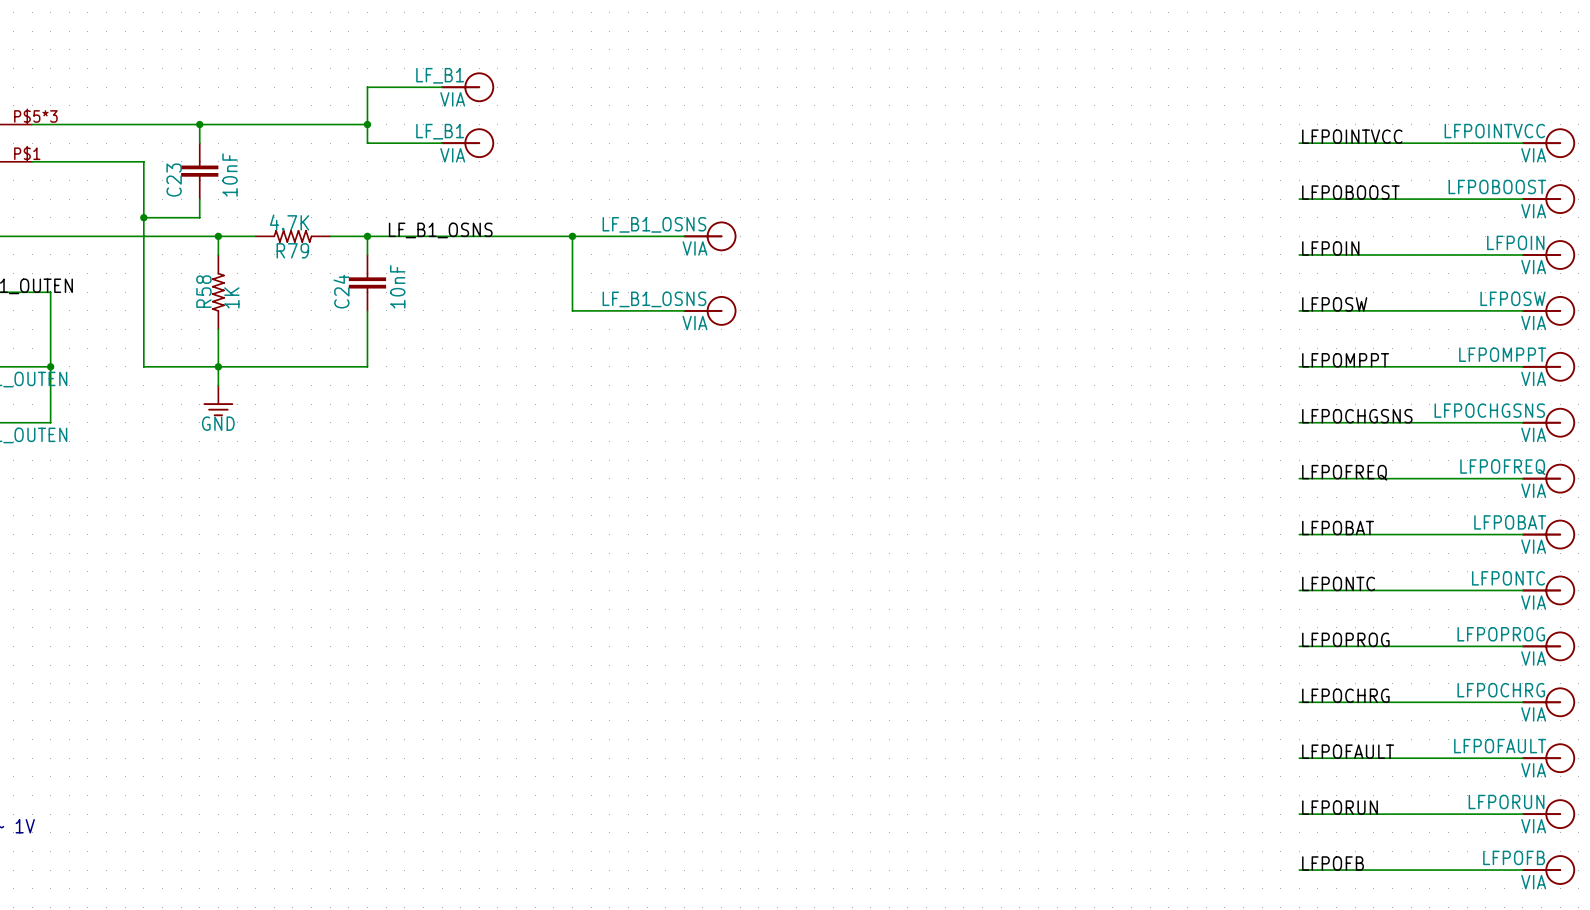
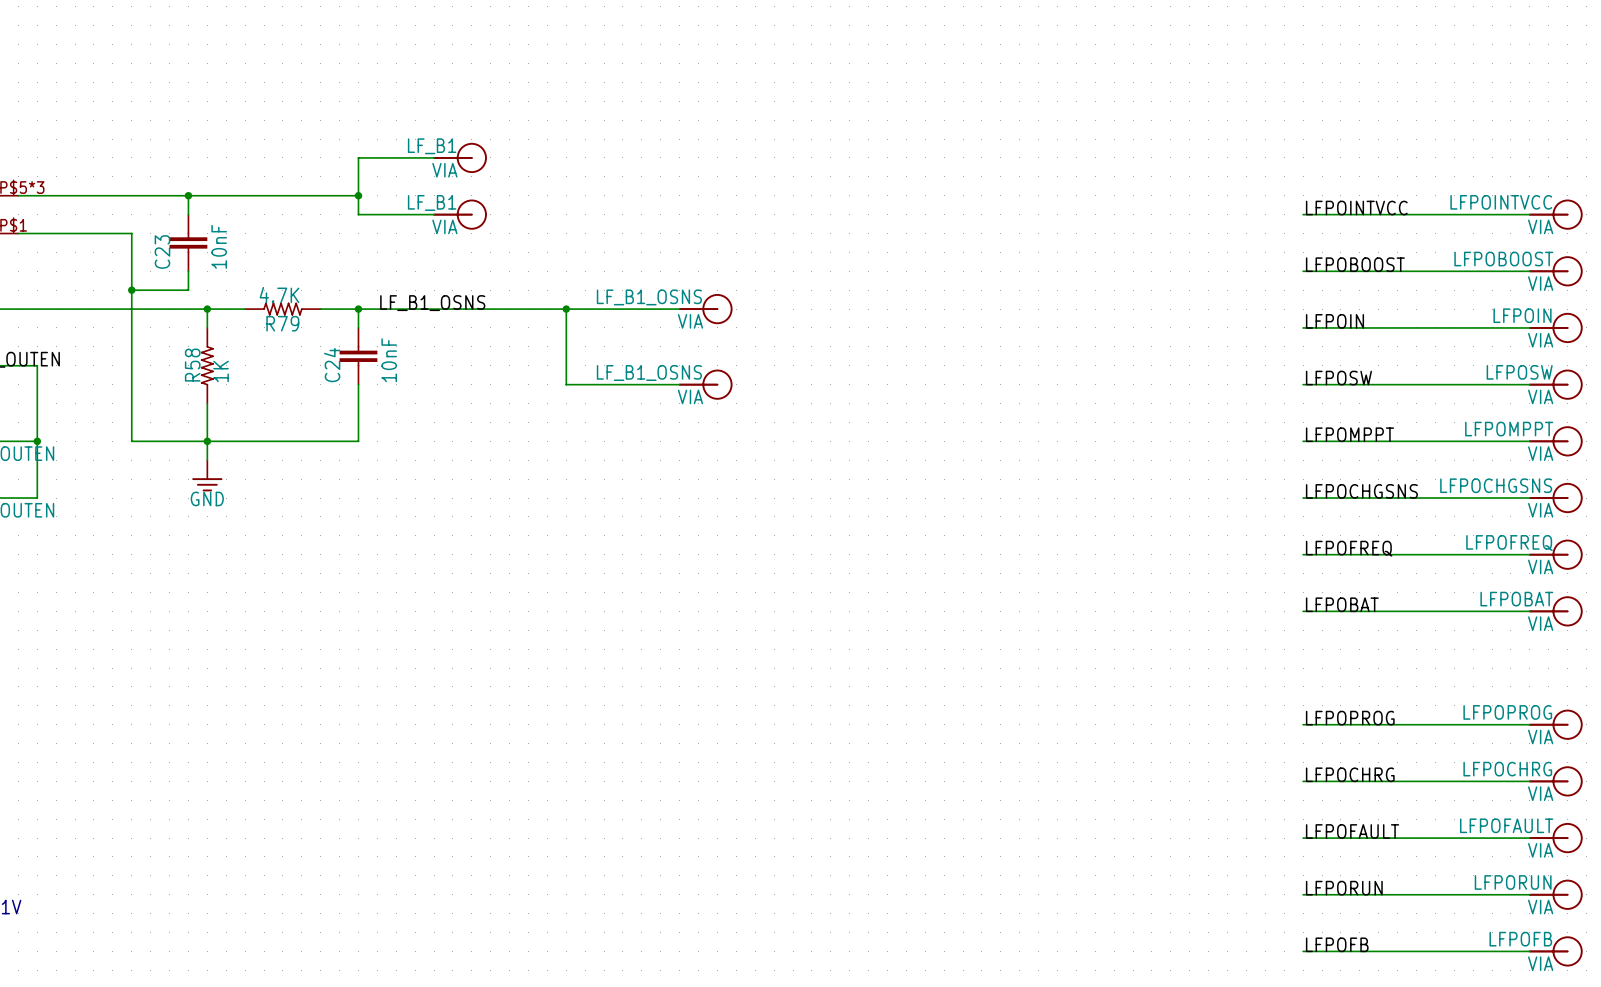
label: LFPONTC (1338, 583) -> none
wire: (1299, 590) (1522, 590) -> none
part: LFPONTC (1548, 590) -> none

